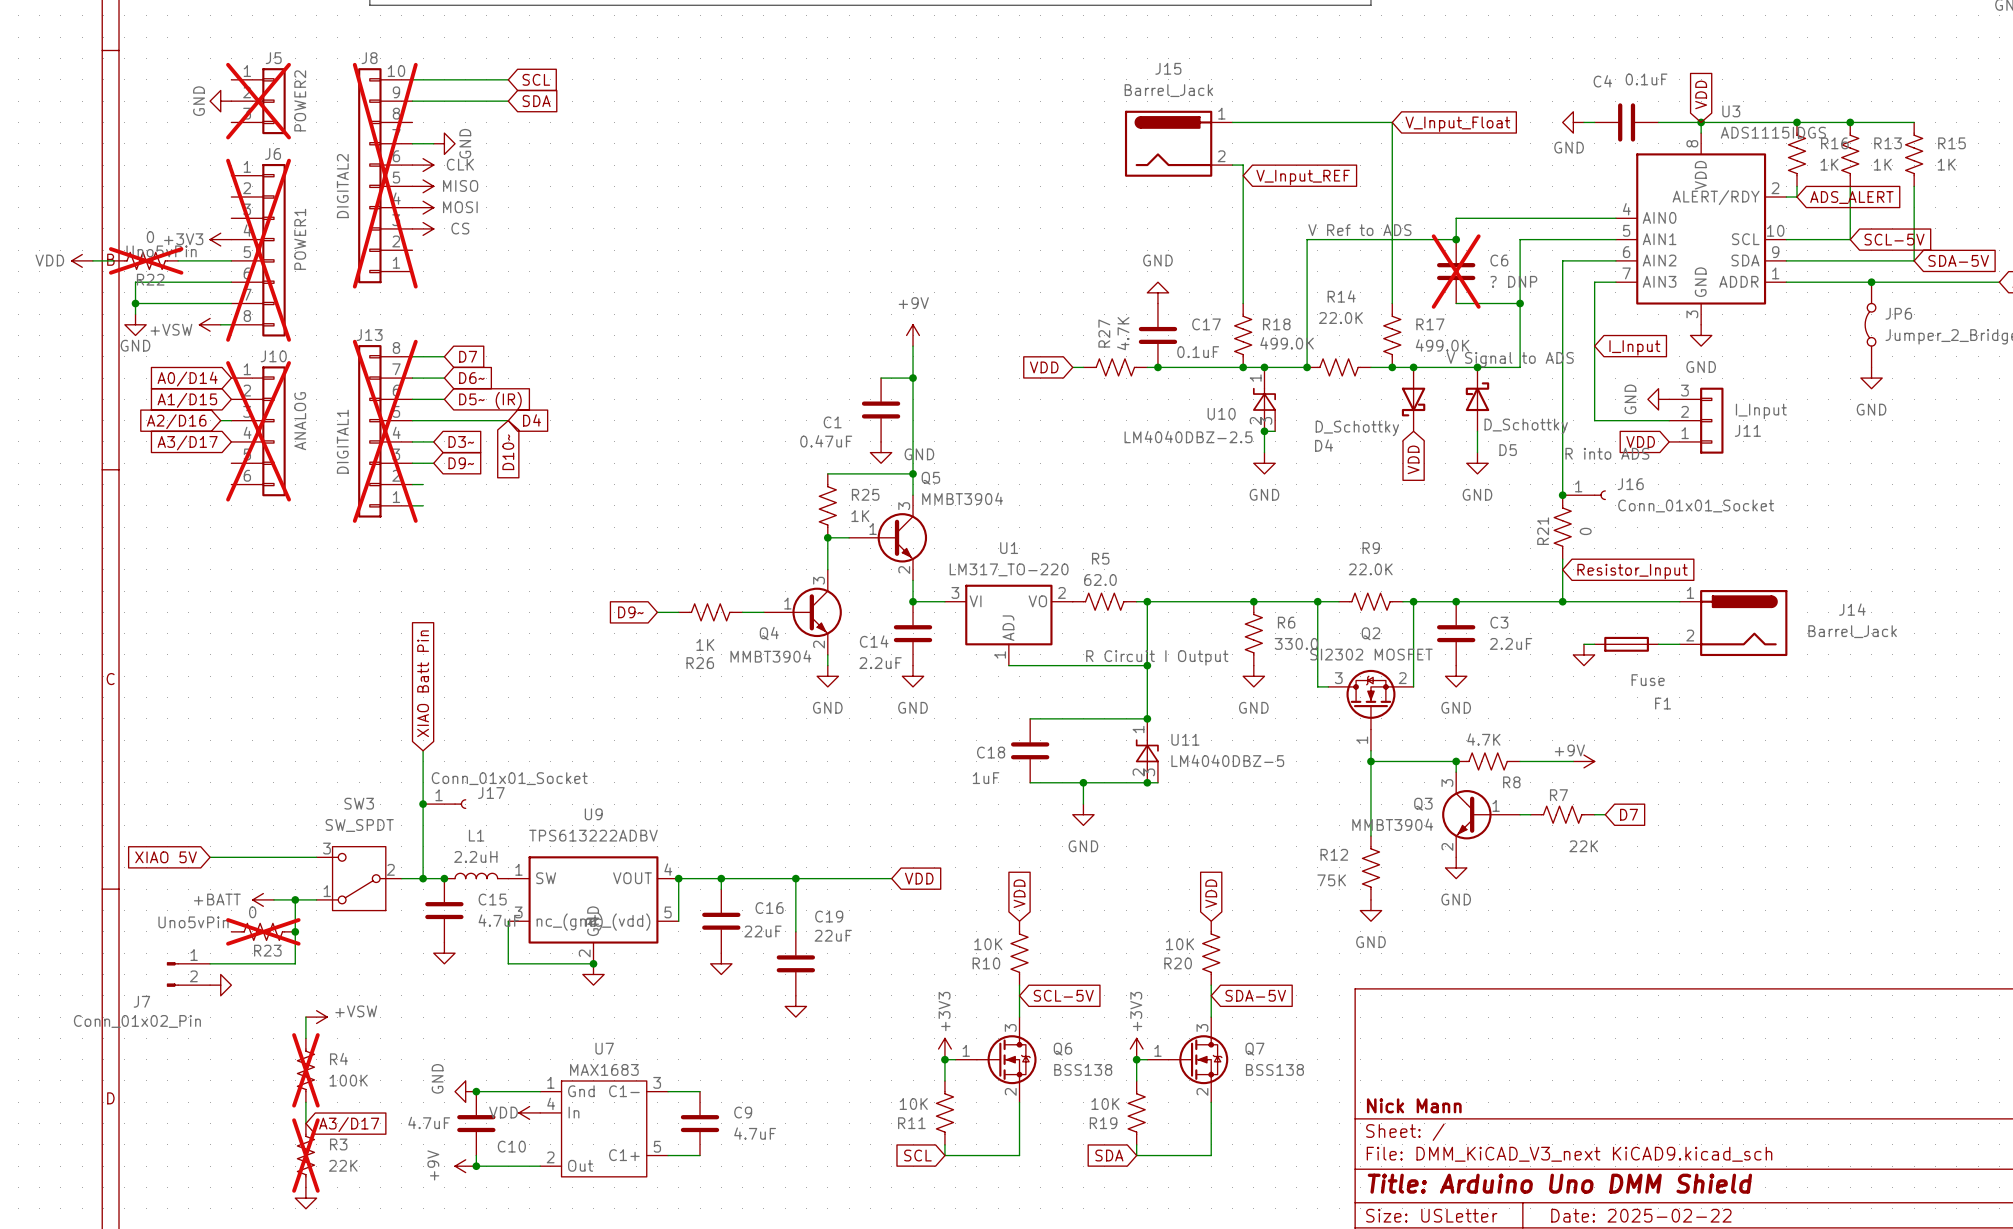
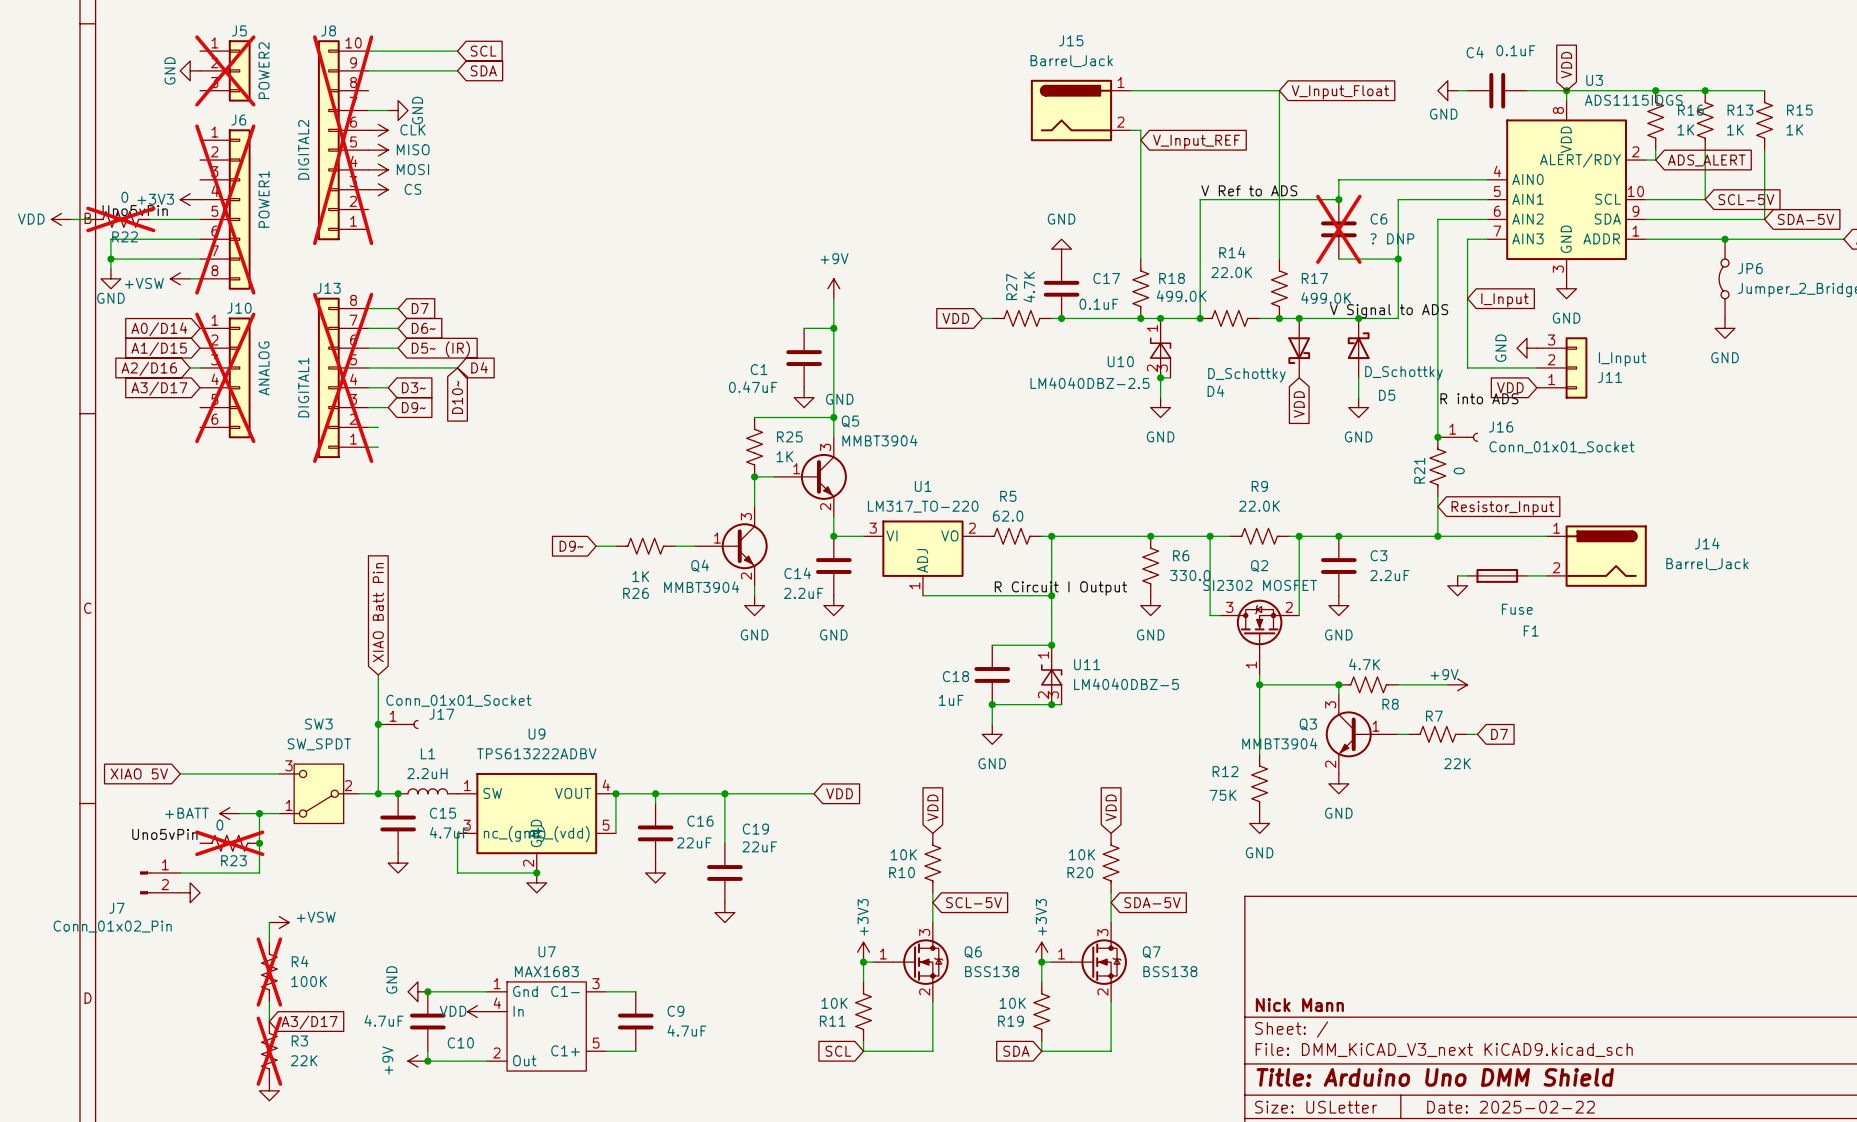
wire: (1030, 718) (1083, 718) -> none
C18 position: (1030, 750) -> (992, 674)
wire: (1030, 782) (1083, 782) -> none

